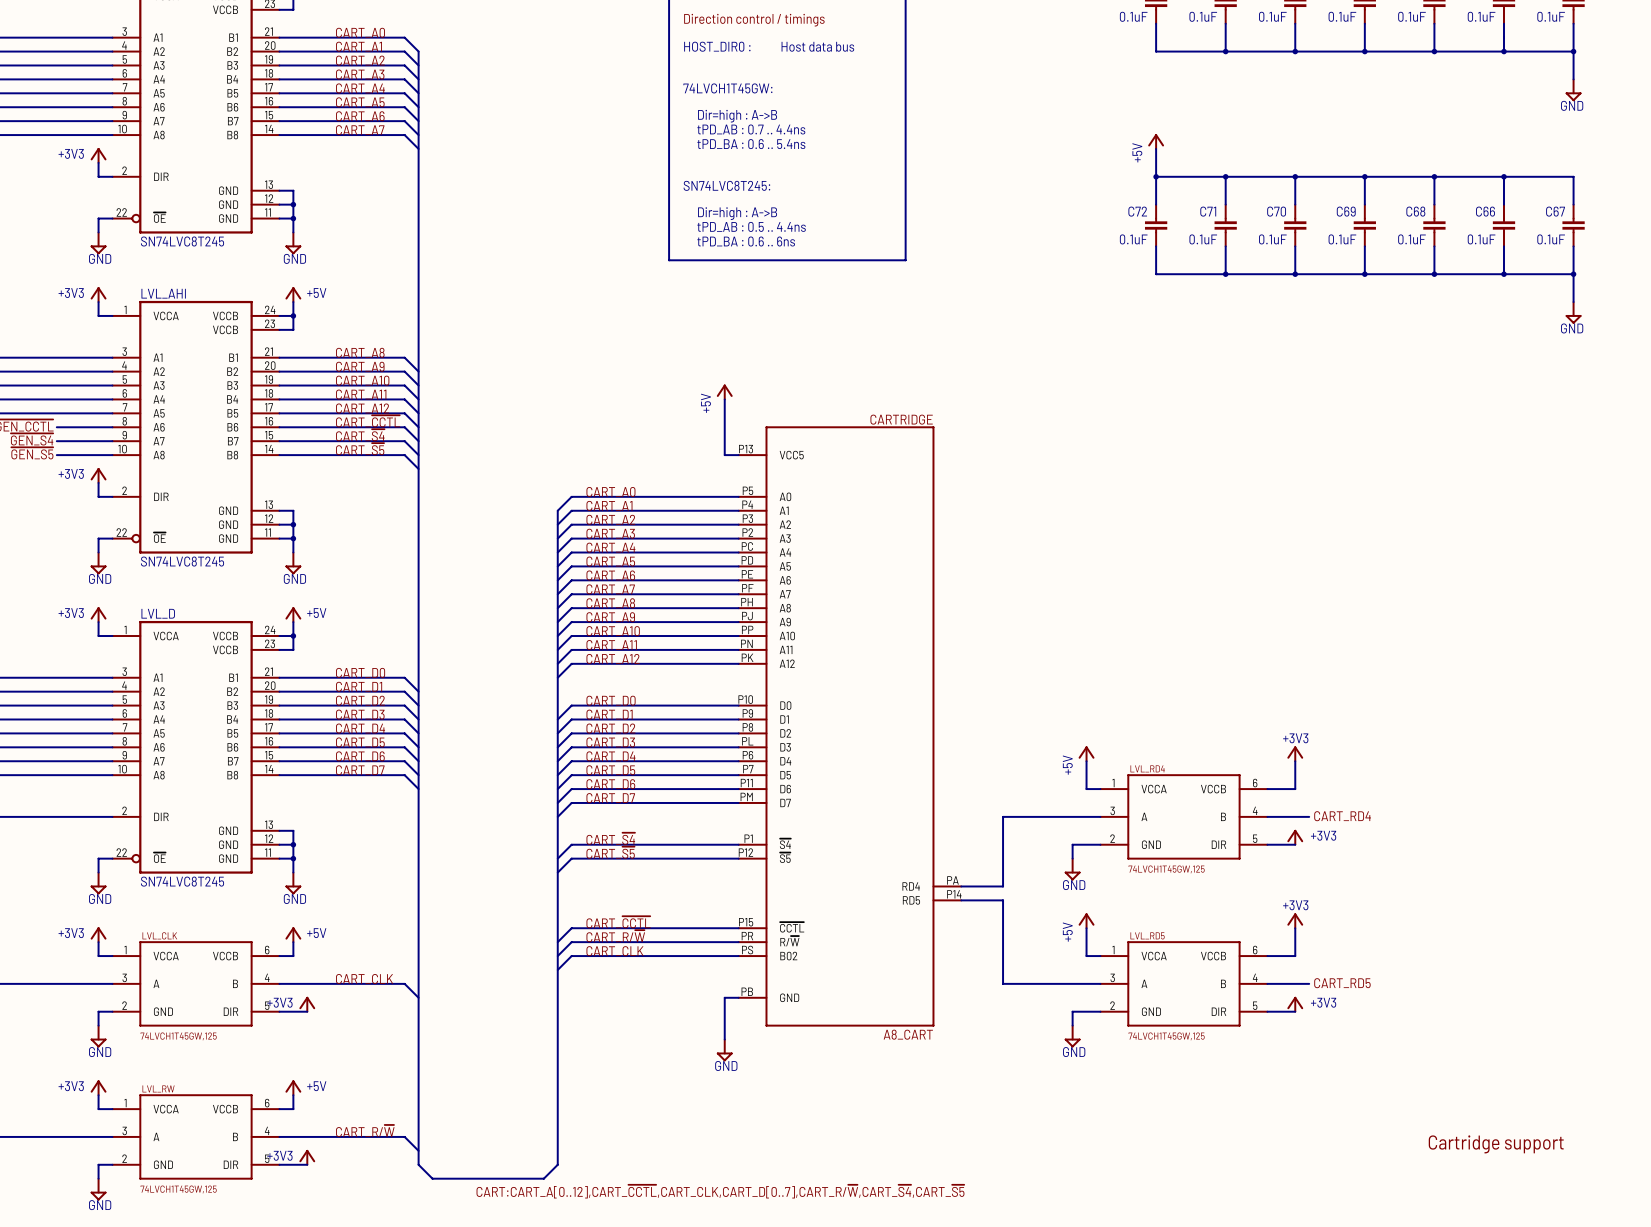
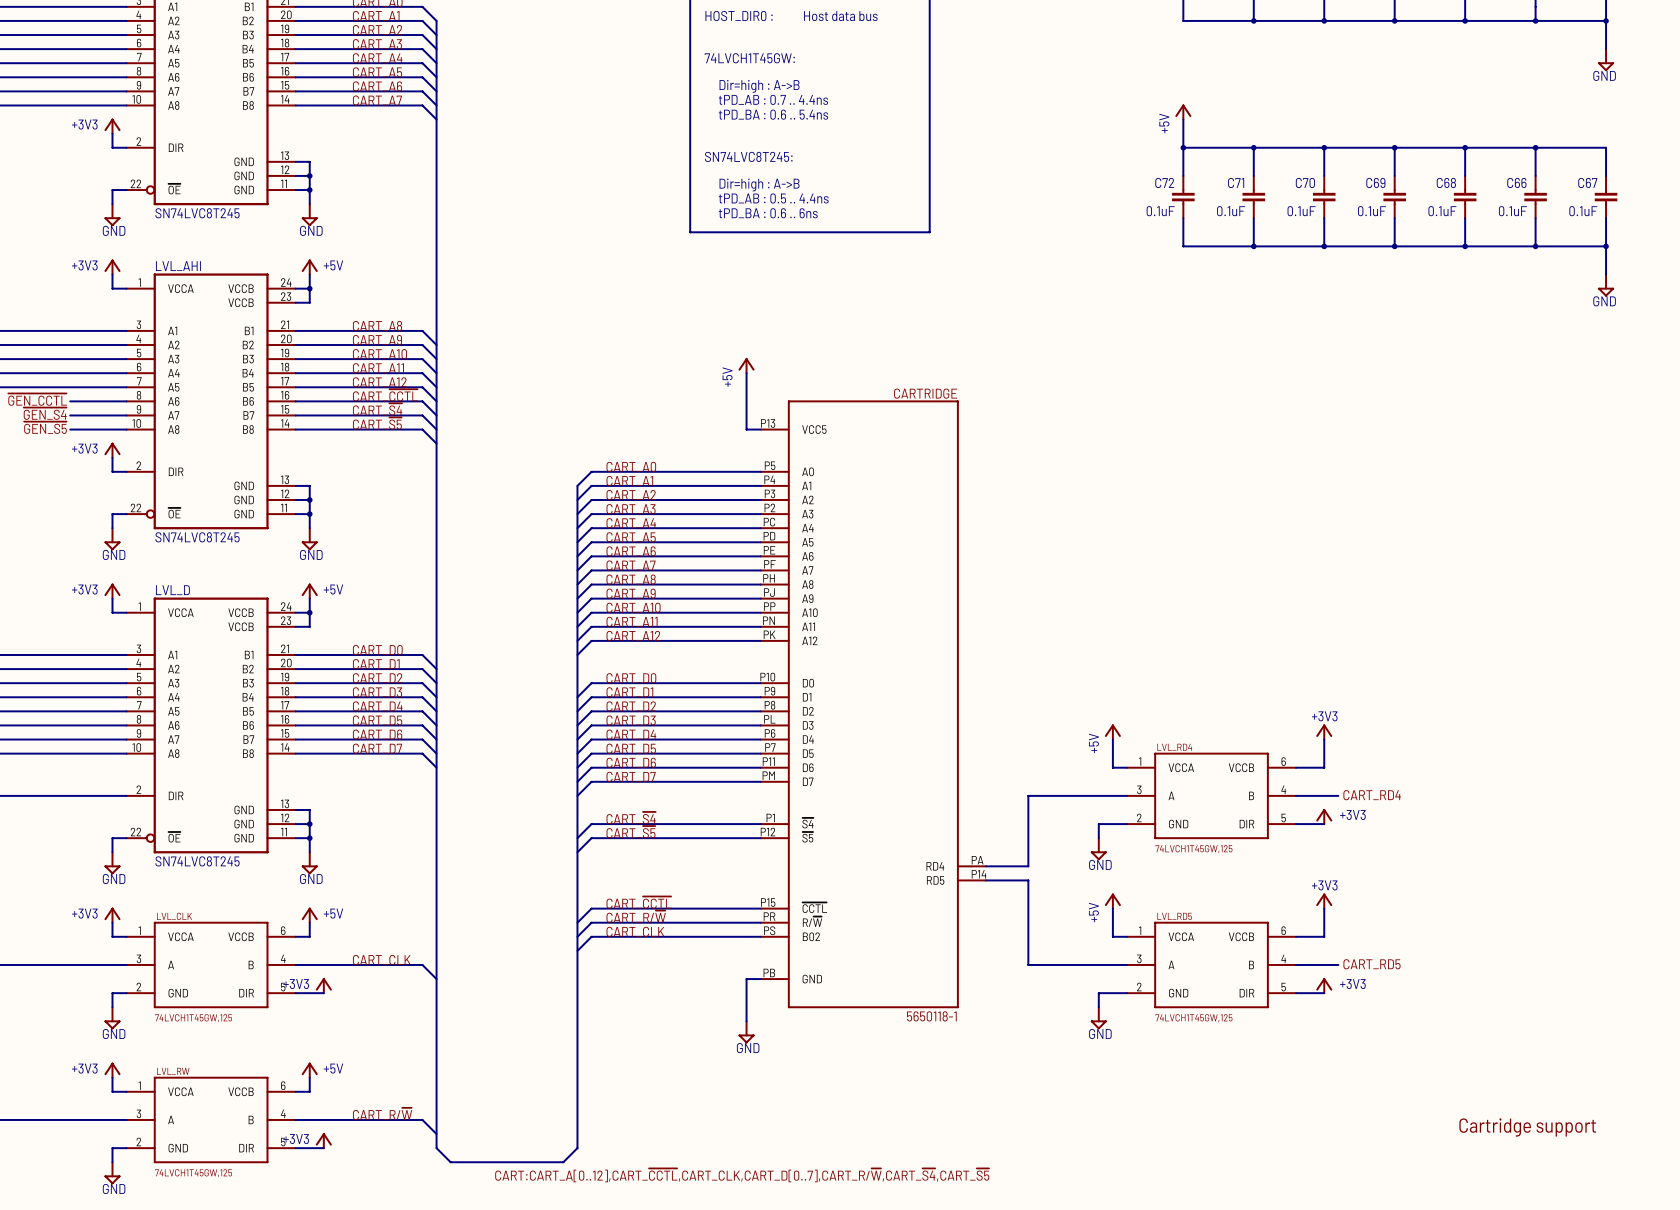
CARTRIDGE value: A8_CART (908, 1034) -> 5650118-1 (931, 1016)

